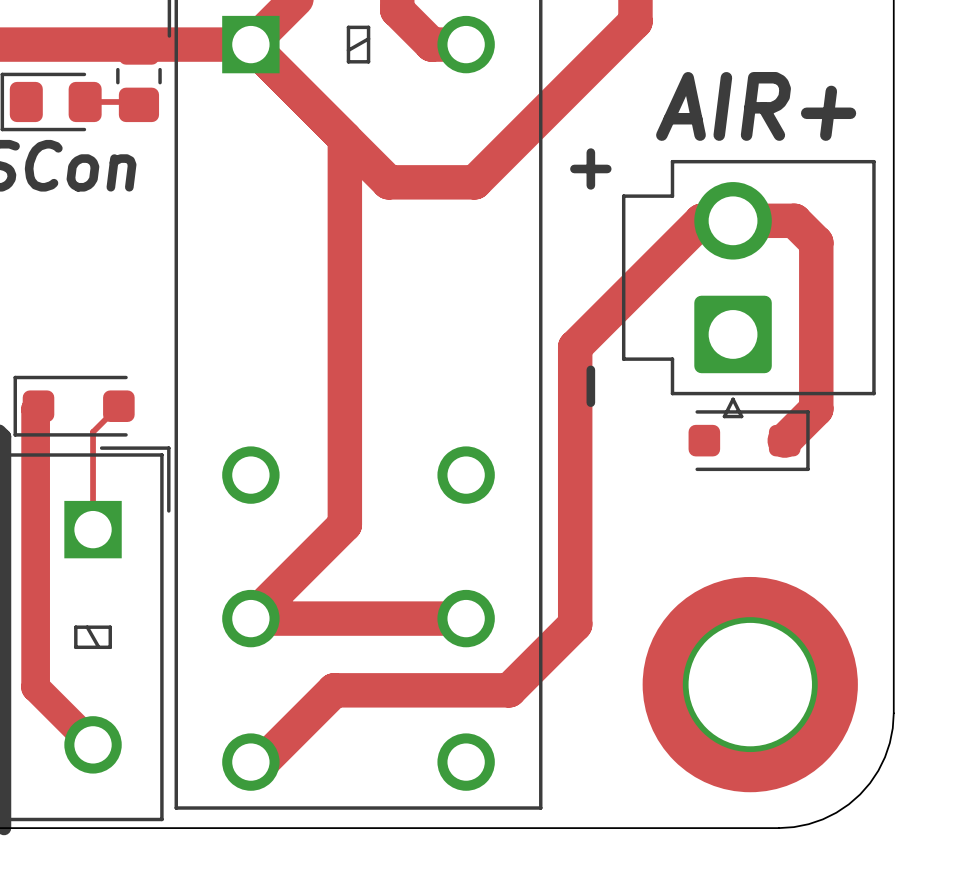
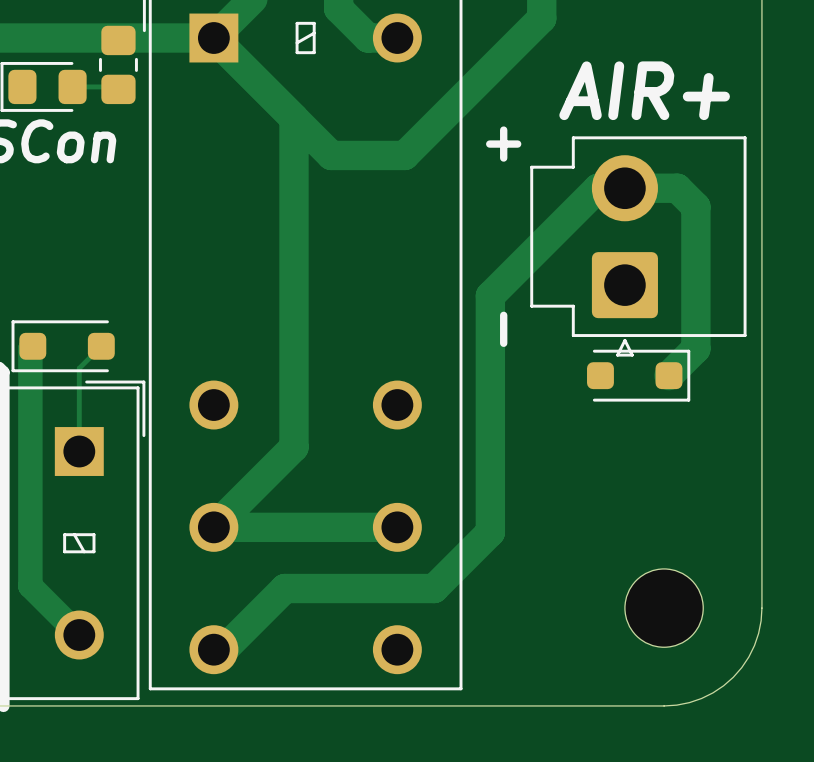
part: (750, 684) -> none
part: none -> (664, 608)

